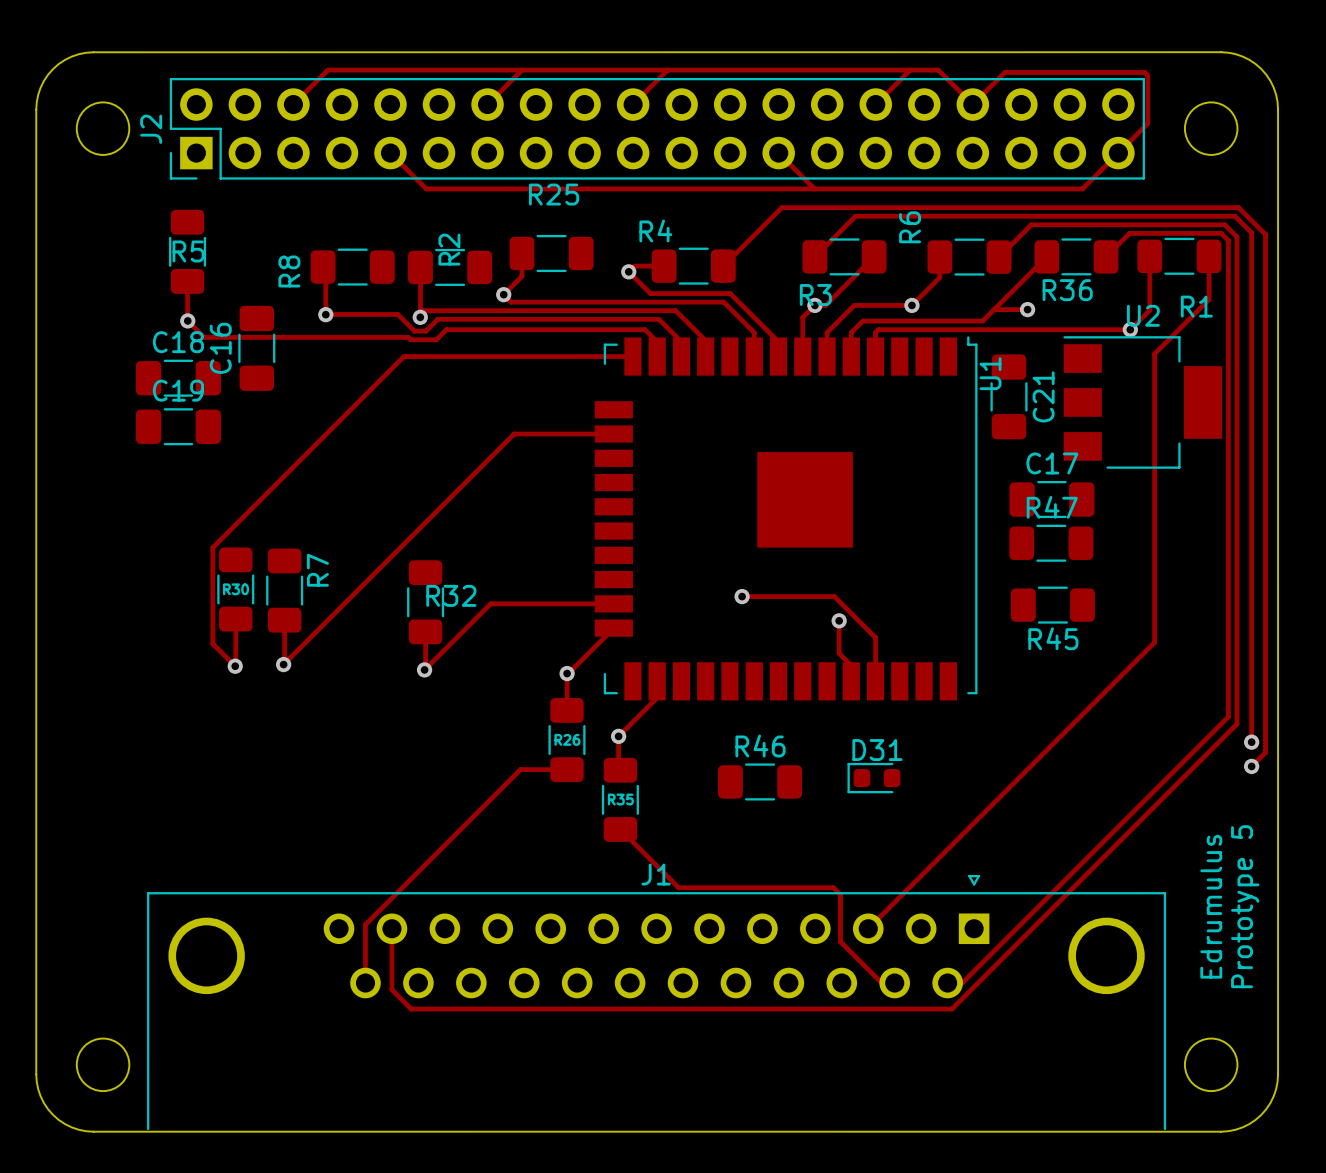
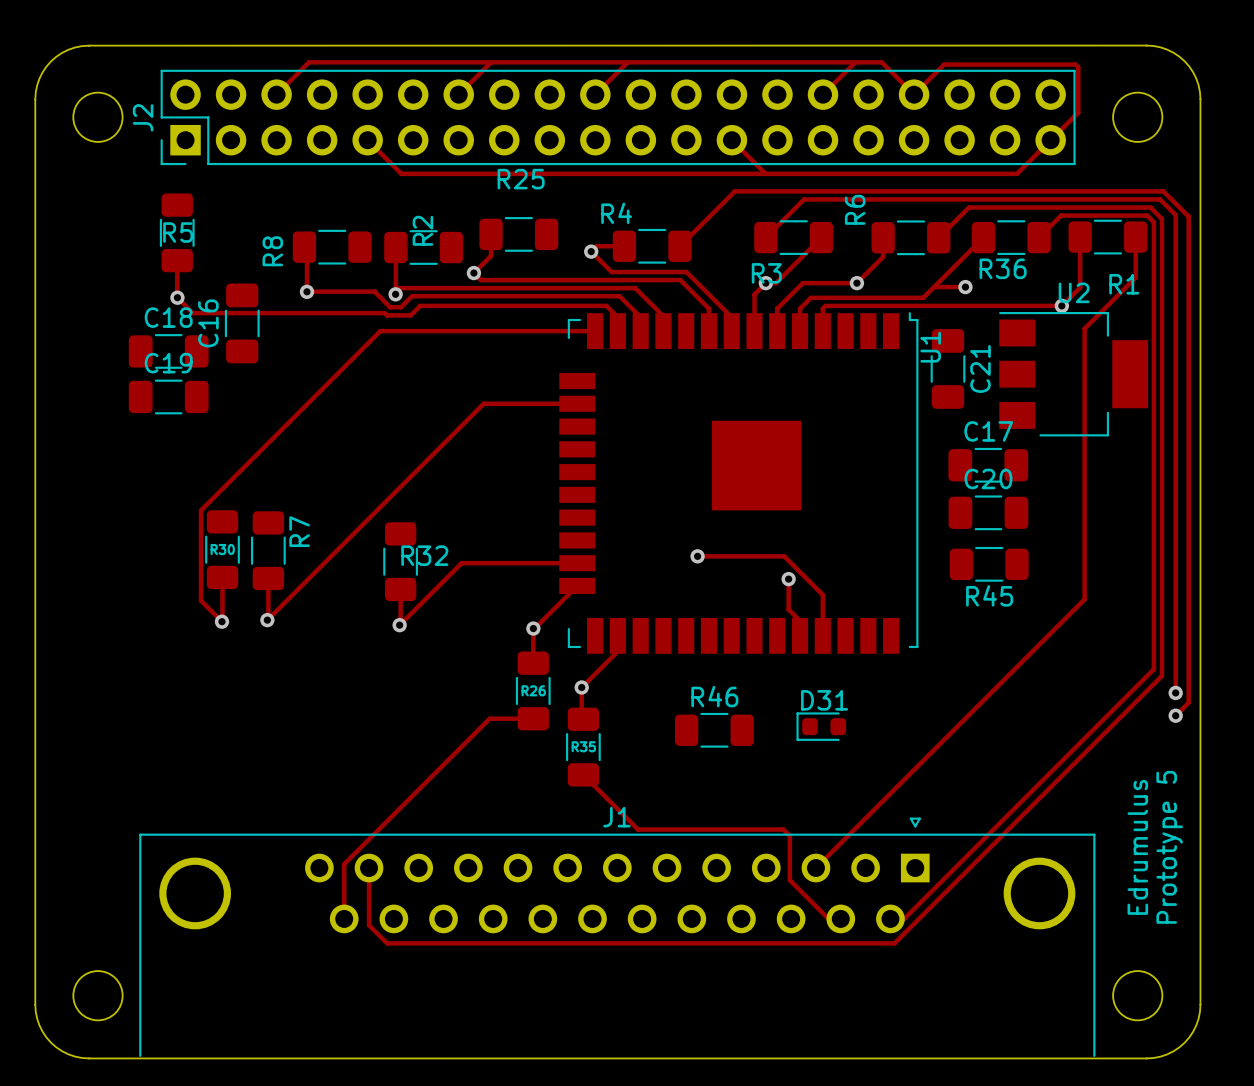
R47: (1051, 543) -> none
C20: none -> (988, 512)

